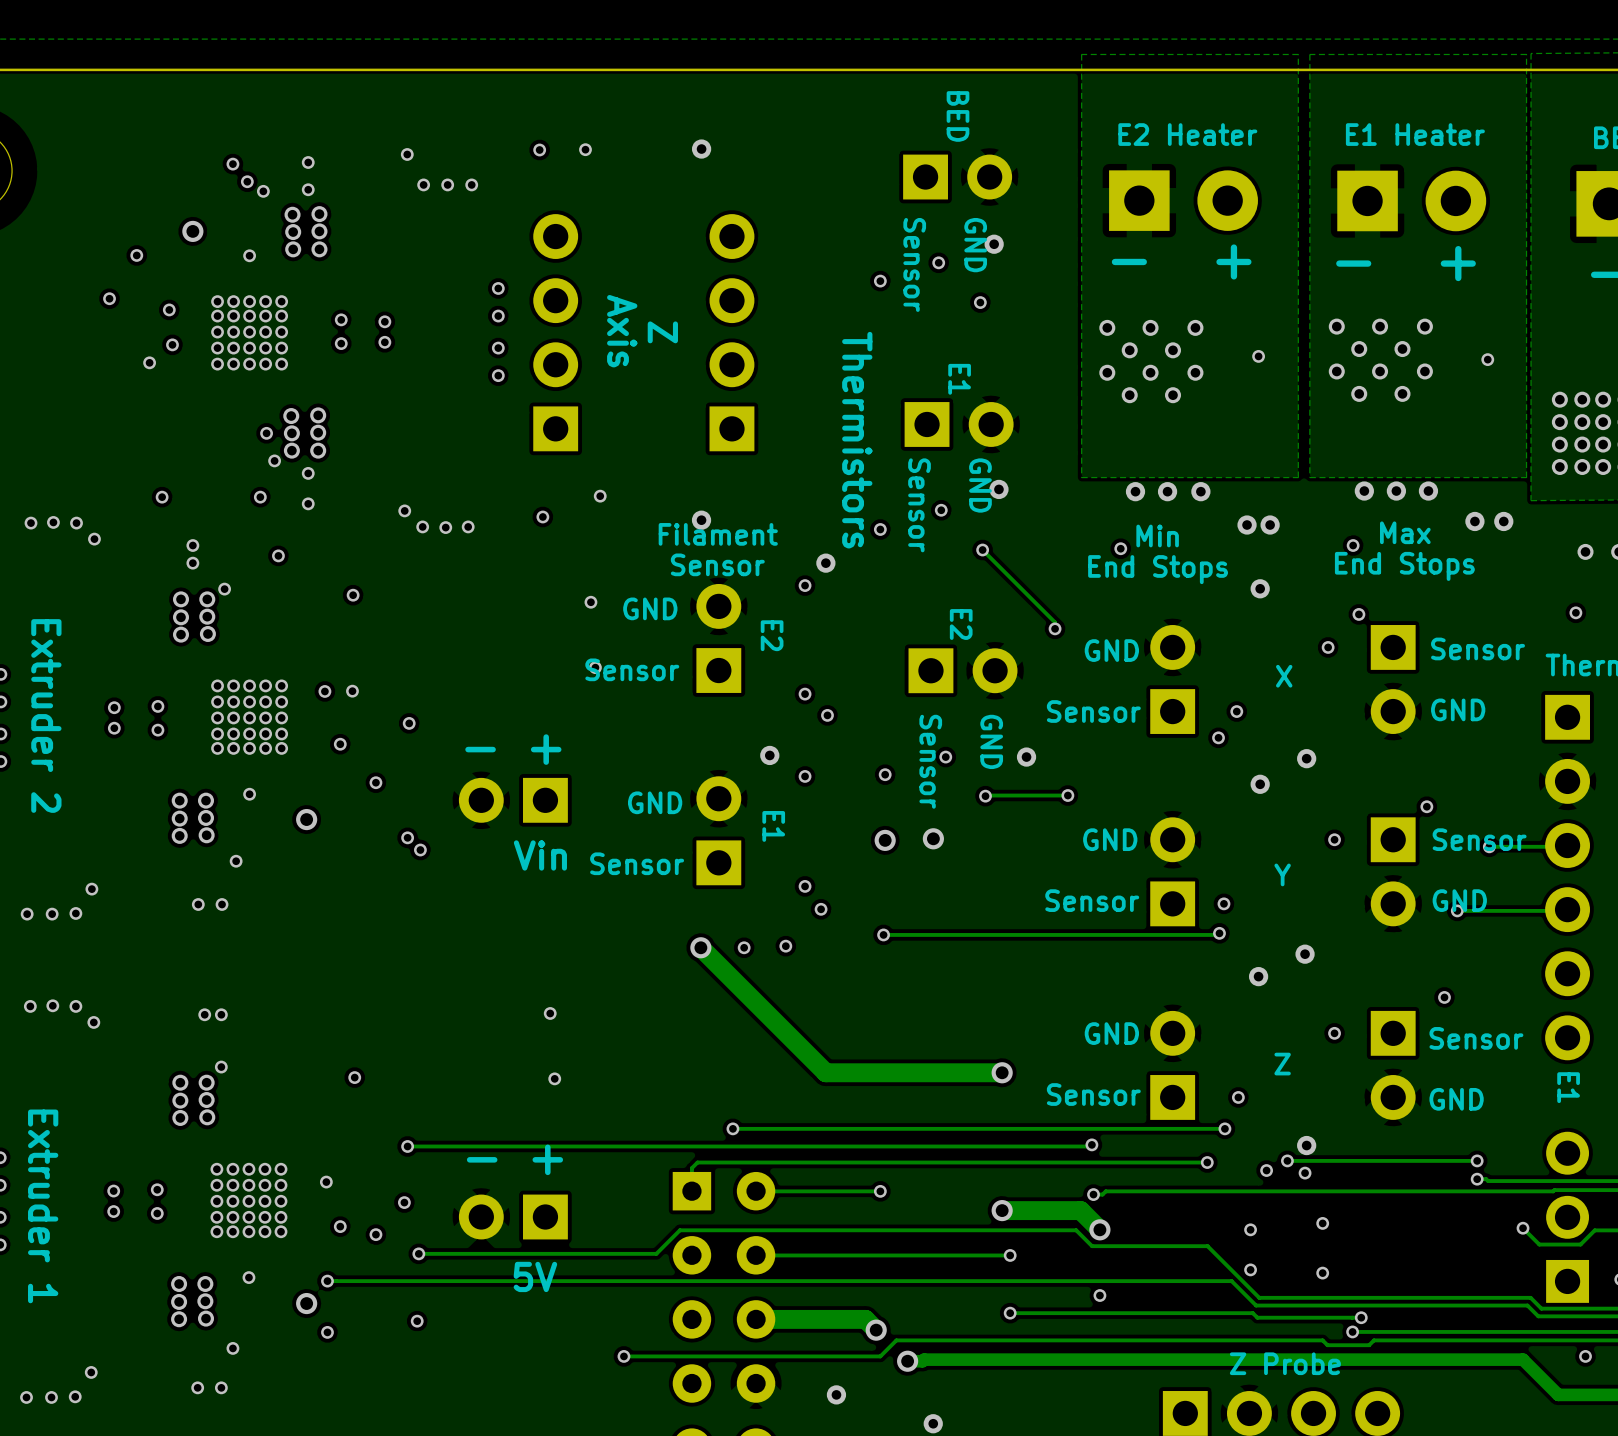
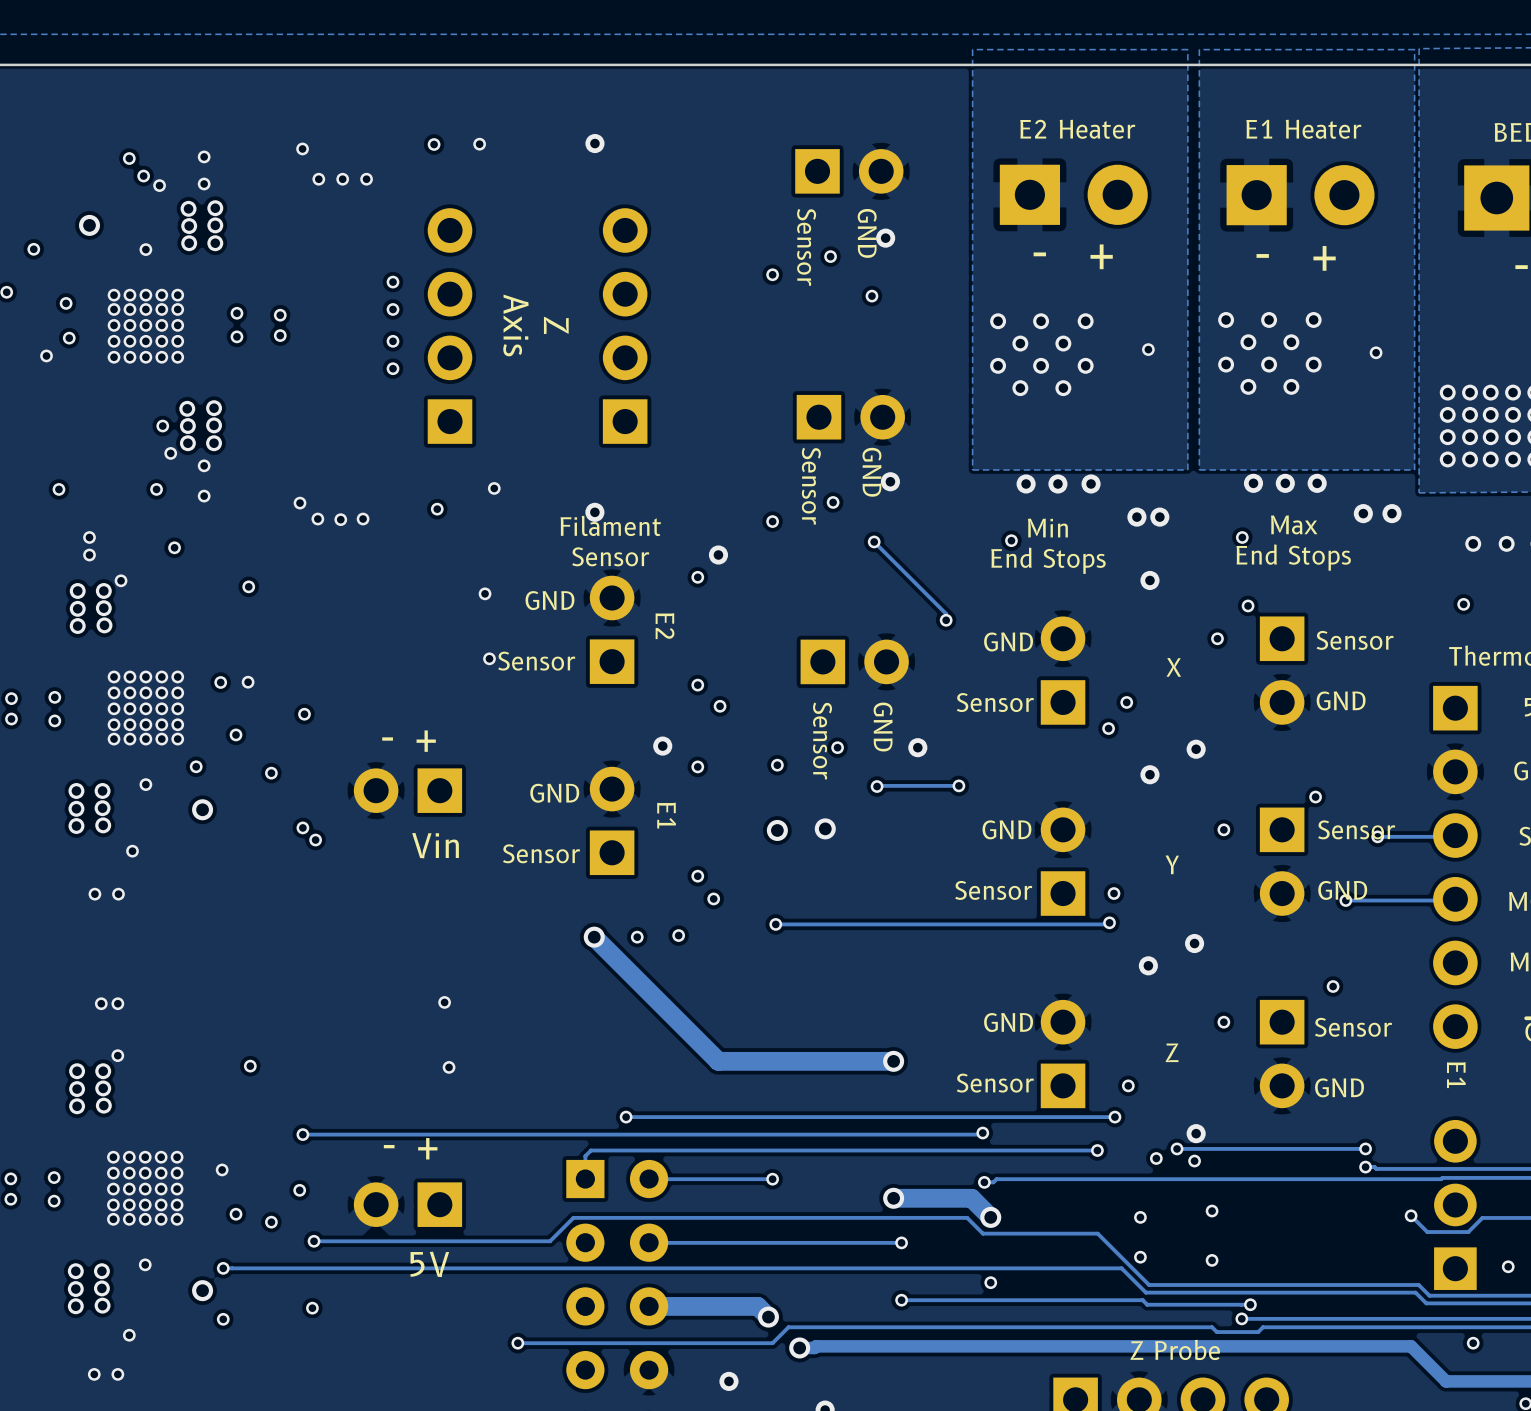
text: BED (958, 116) -> none
text: E1 (959, 379) -> none
text: Thermistors (857, 440) -> none
text: E2 (961, 624) -> none
via: none -> (196, 766)

